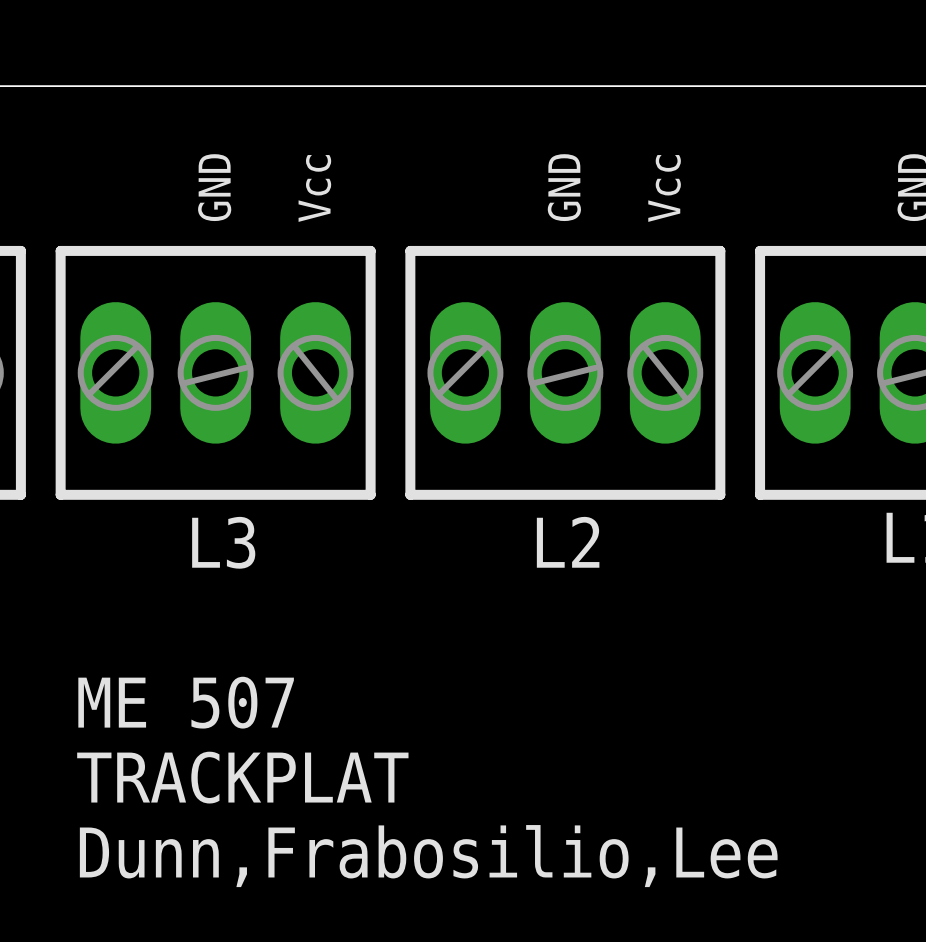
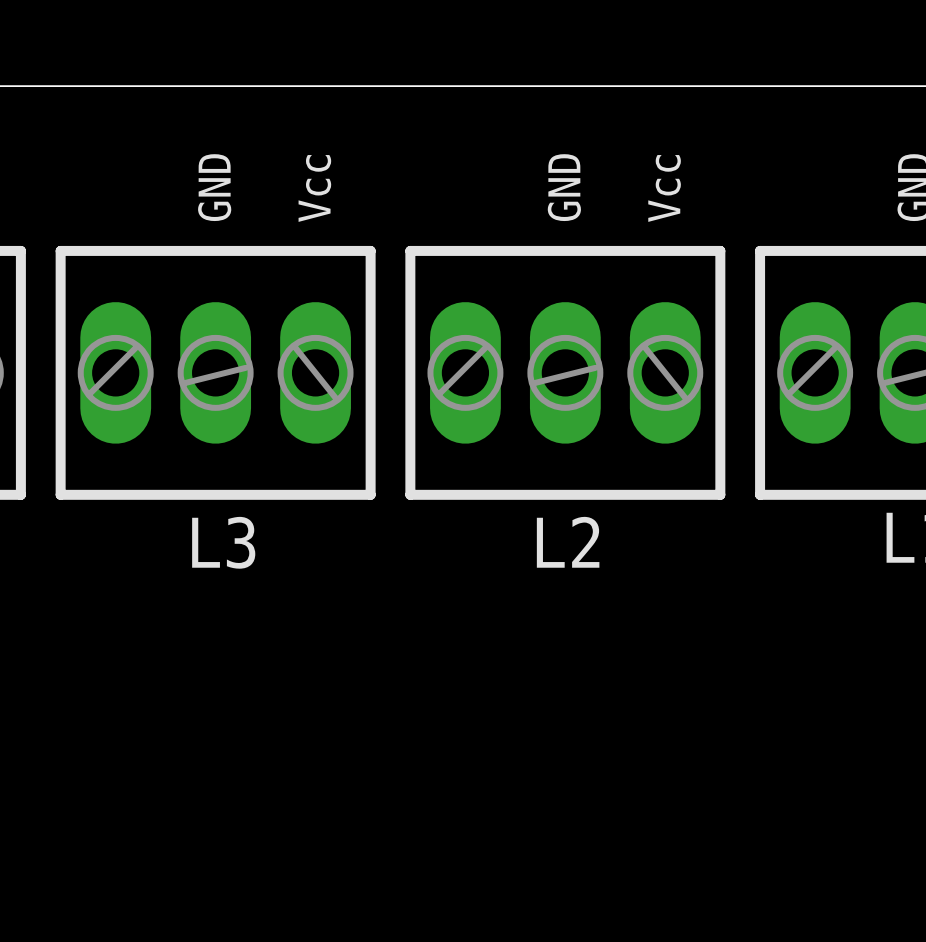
text: ME 507 (186, 702) -> none
text: TRACKPLAT (242, 777) -> none
text: Dunn,Frabosilio,Lee (428, 856) -> none

